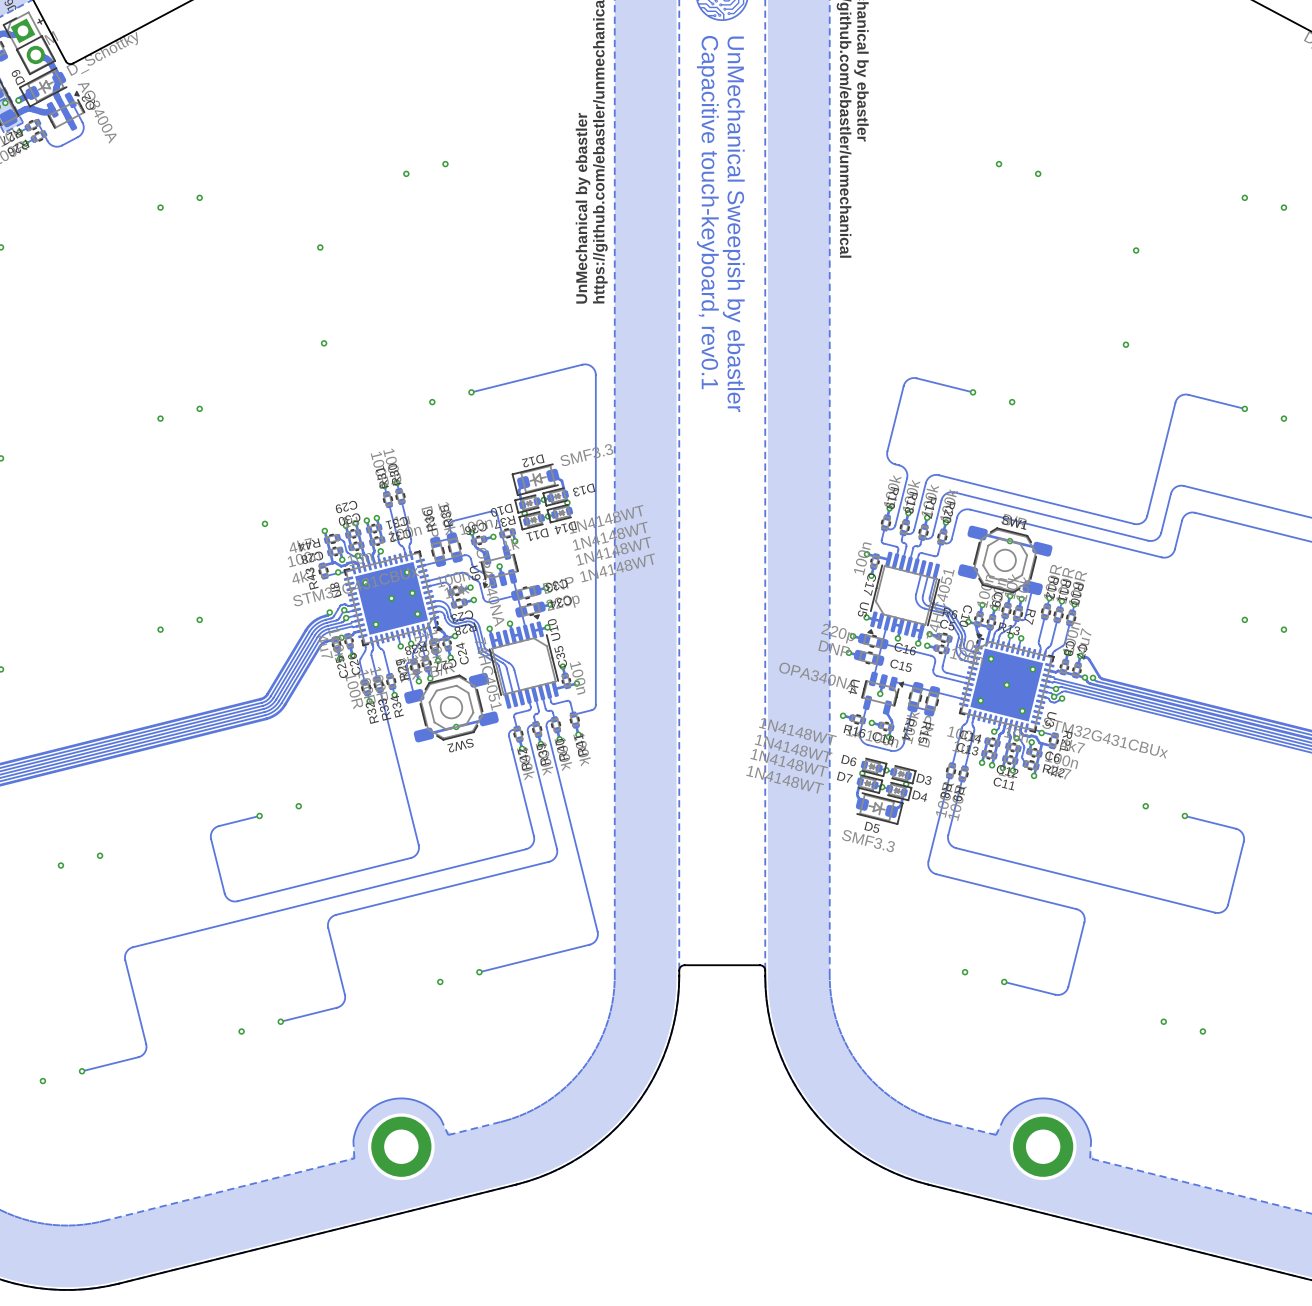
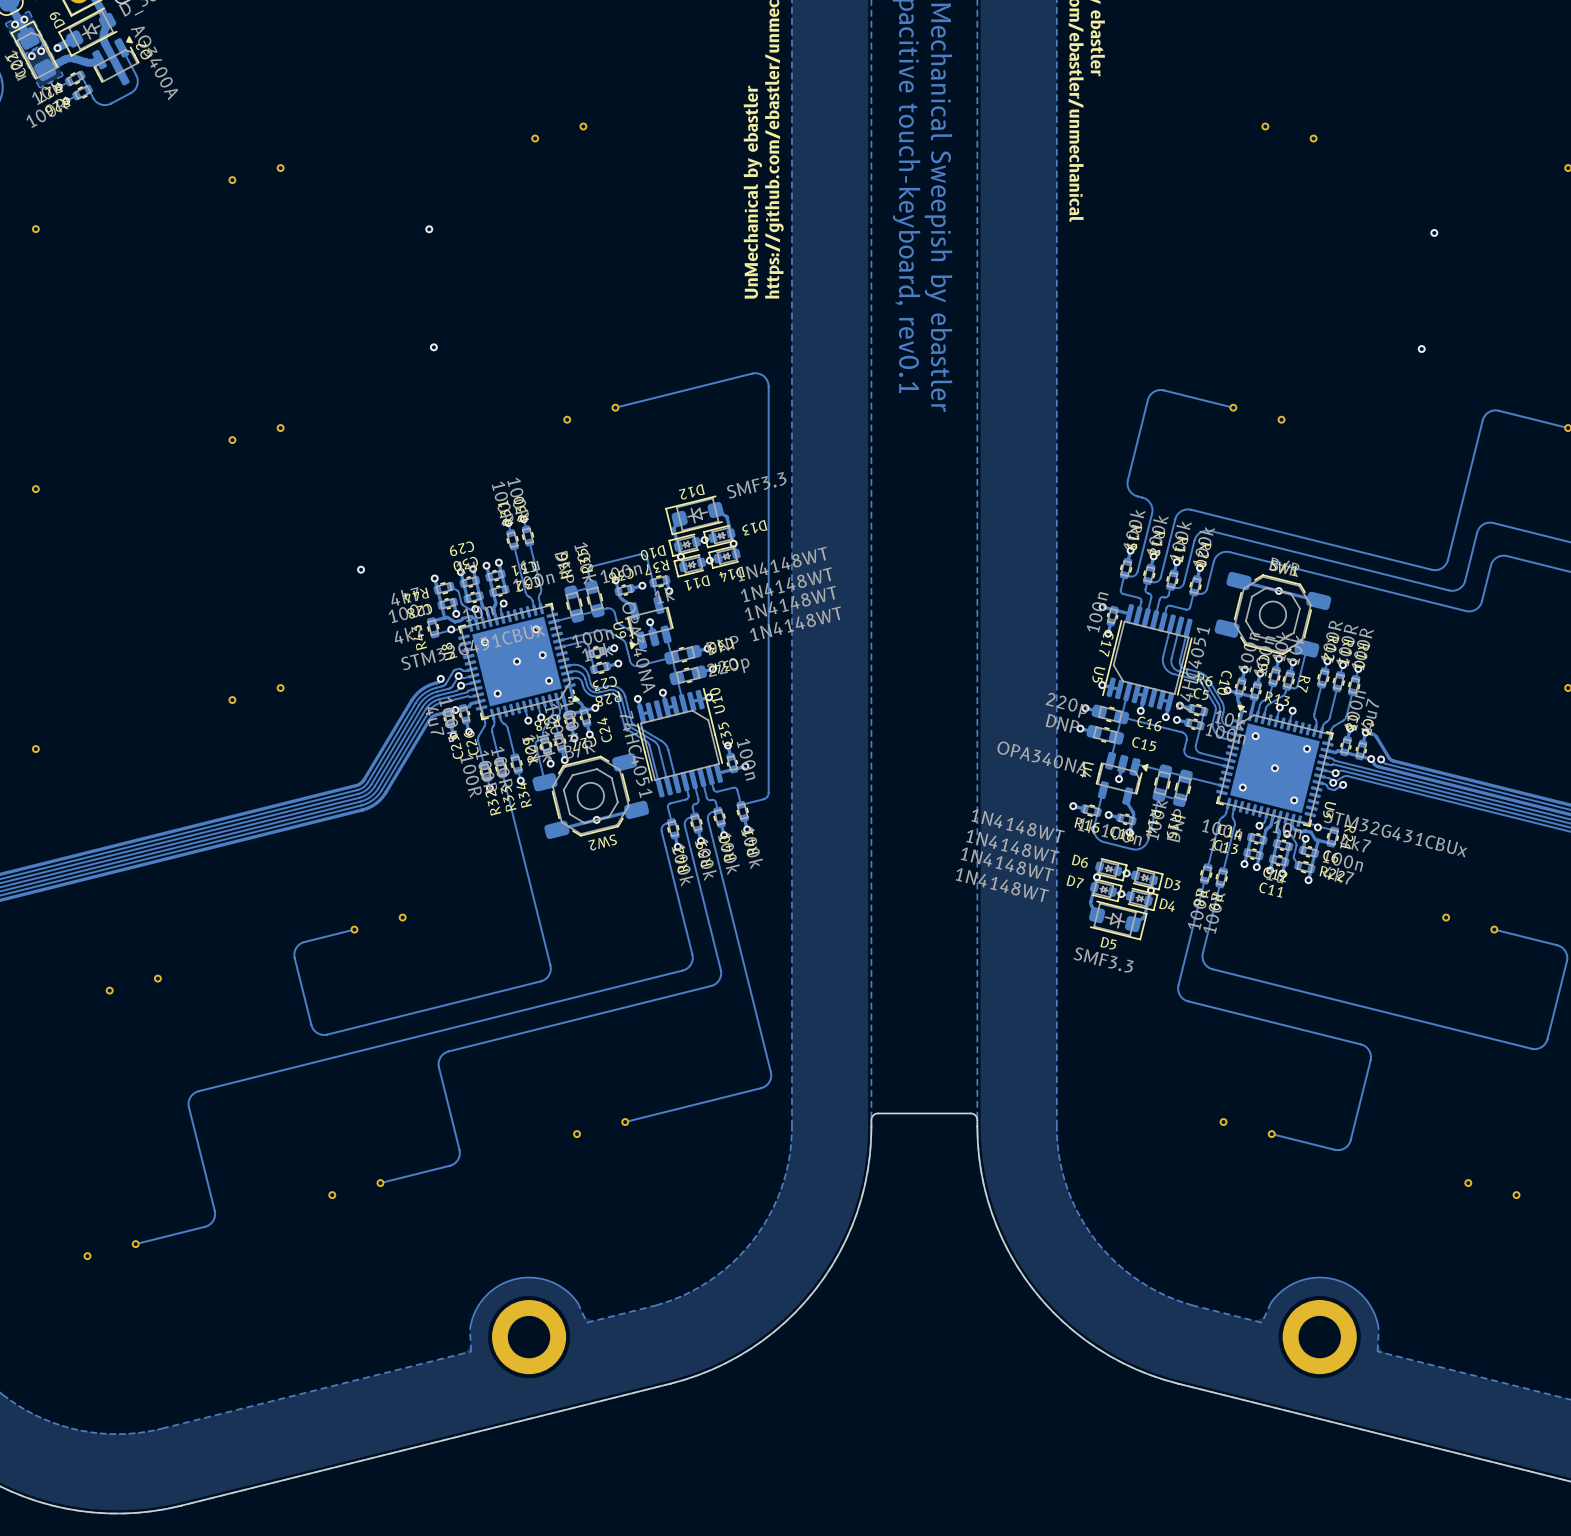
U5 footprint: [867, 551, 941, 640] -> [1102, 603, 1193, 712]
U10 footprint: [489, 614, 559, 709] -> [637, 687, 724, 798]

